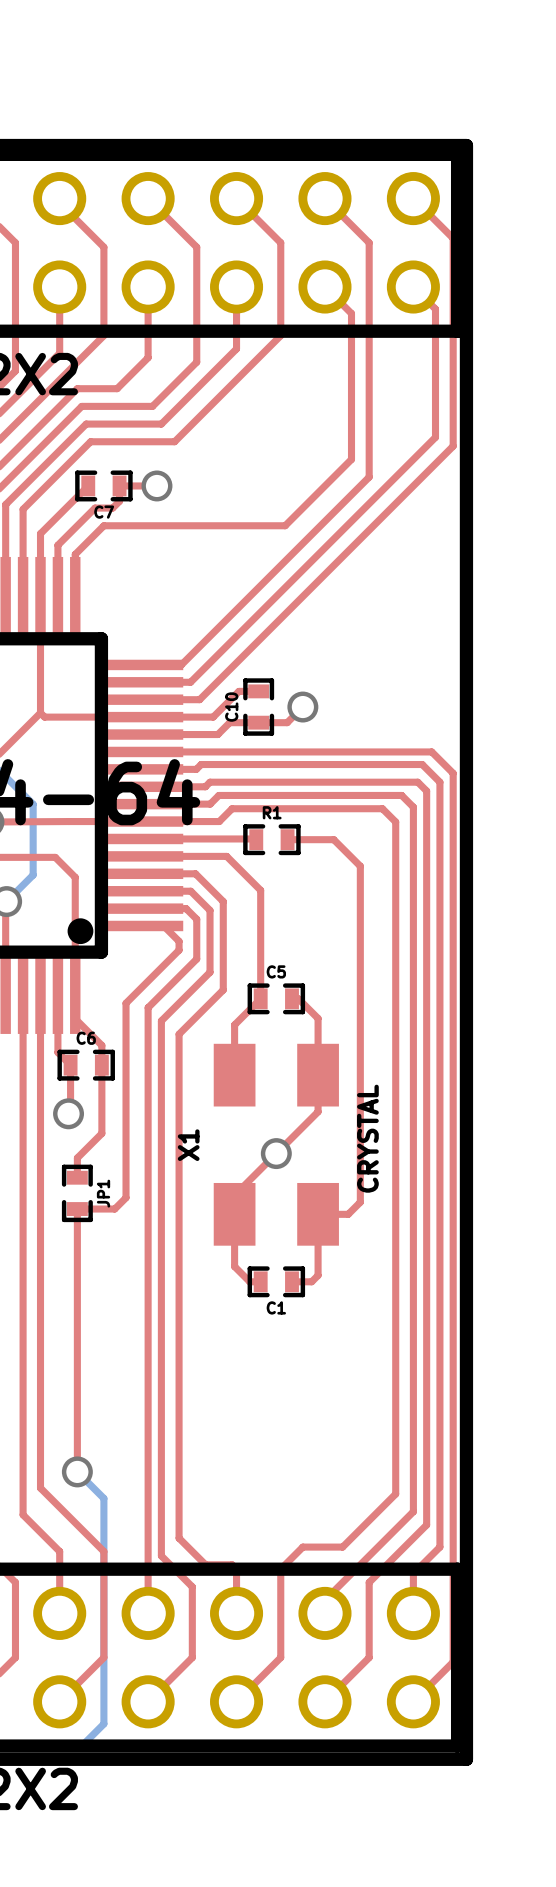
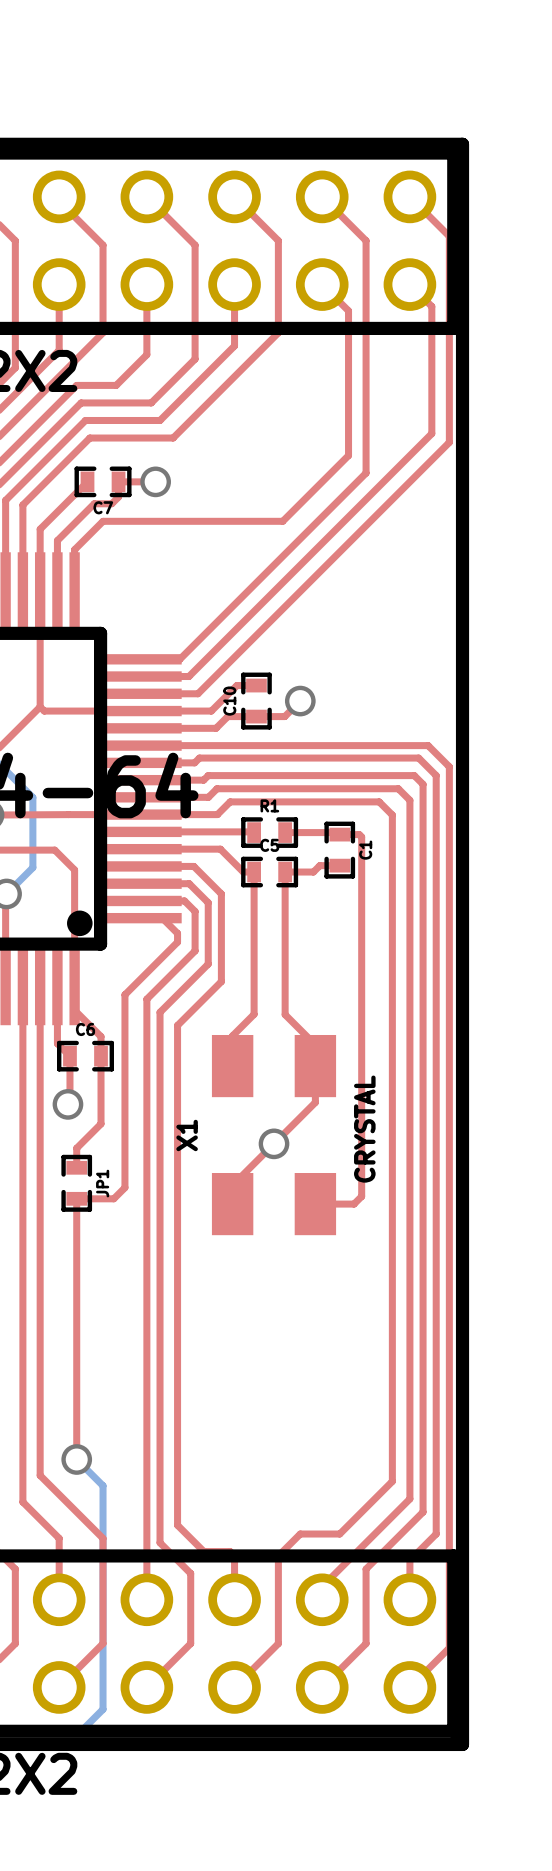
top track: (333, 839) (360, 866) (360, 1202) (348, 1214) -> (331, 832) (359, 834) (361, 836) (361, 1196) (354, 1204) (345, 1204)
top track: (222, 856) (226, 856) (260, 890) (260, 998) (234, 1024) (234, 1044) -> (220, 849) (243, 872) (254, 872) (254, 1014) (232, 1035)
C5 position: (276, 998) -> (269, 872)
top track: (291, 998) (298, 998) (318, 1018) (318, 1053) -> (339, 865) (319, 865) (313, 872) (285, 872) (285, 1014) (315, 1044)
top track: (234, 1214) (234, 1266) (249, 1281) (260, 1281) -> none
top track: (318, 1214) (318, 1275) (311, 1281) (291, 1281) -> none
C1 rotation: 0° (276, 1281) -> 90° clockwise (339, 850)
C1 position: (276, 1281) -> (339, 850)

